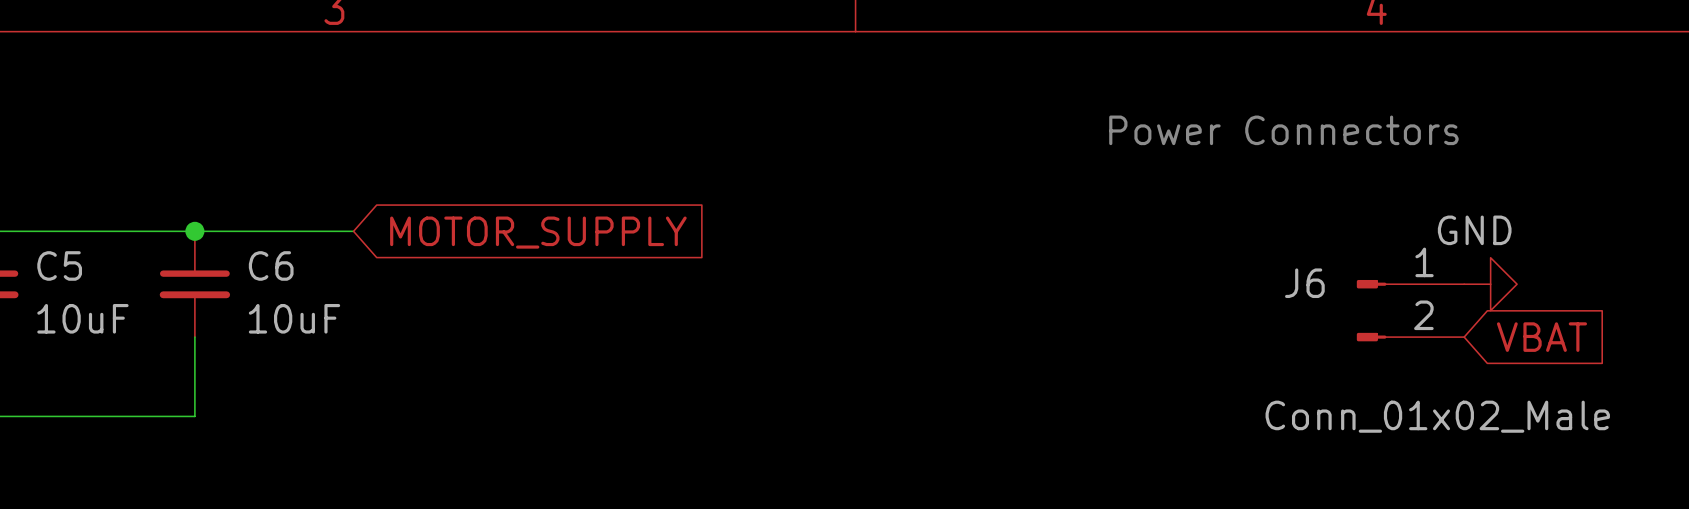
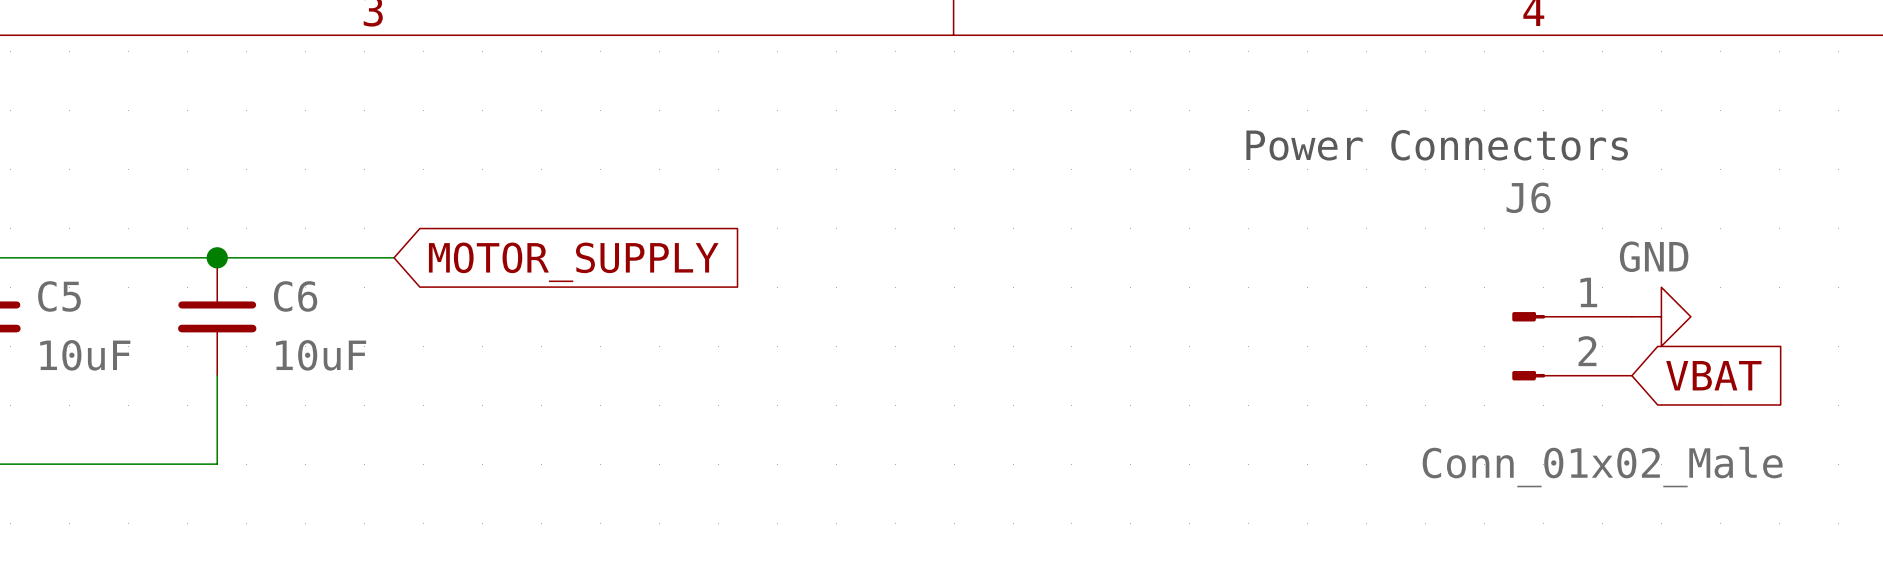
J6 name position: J6 (1304, 283) -> J6 (1528, 197)

